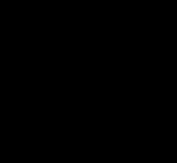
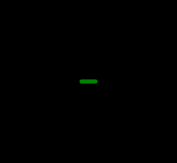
track: none -> (95, 81) (81, 81)

